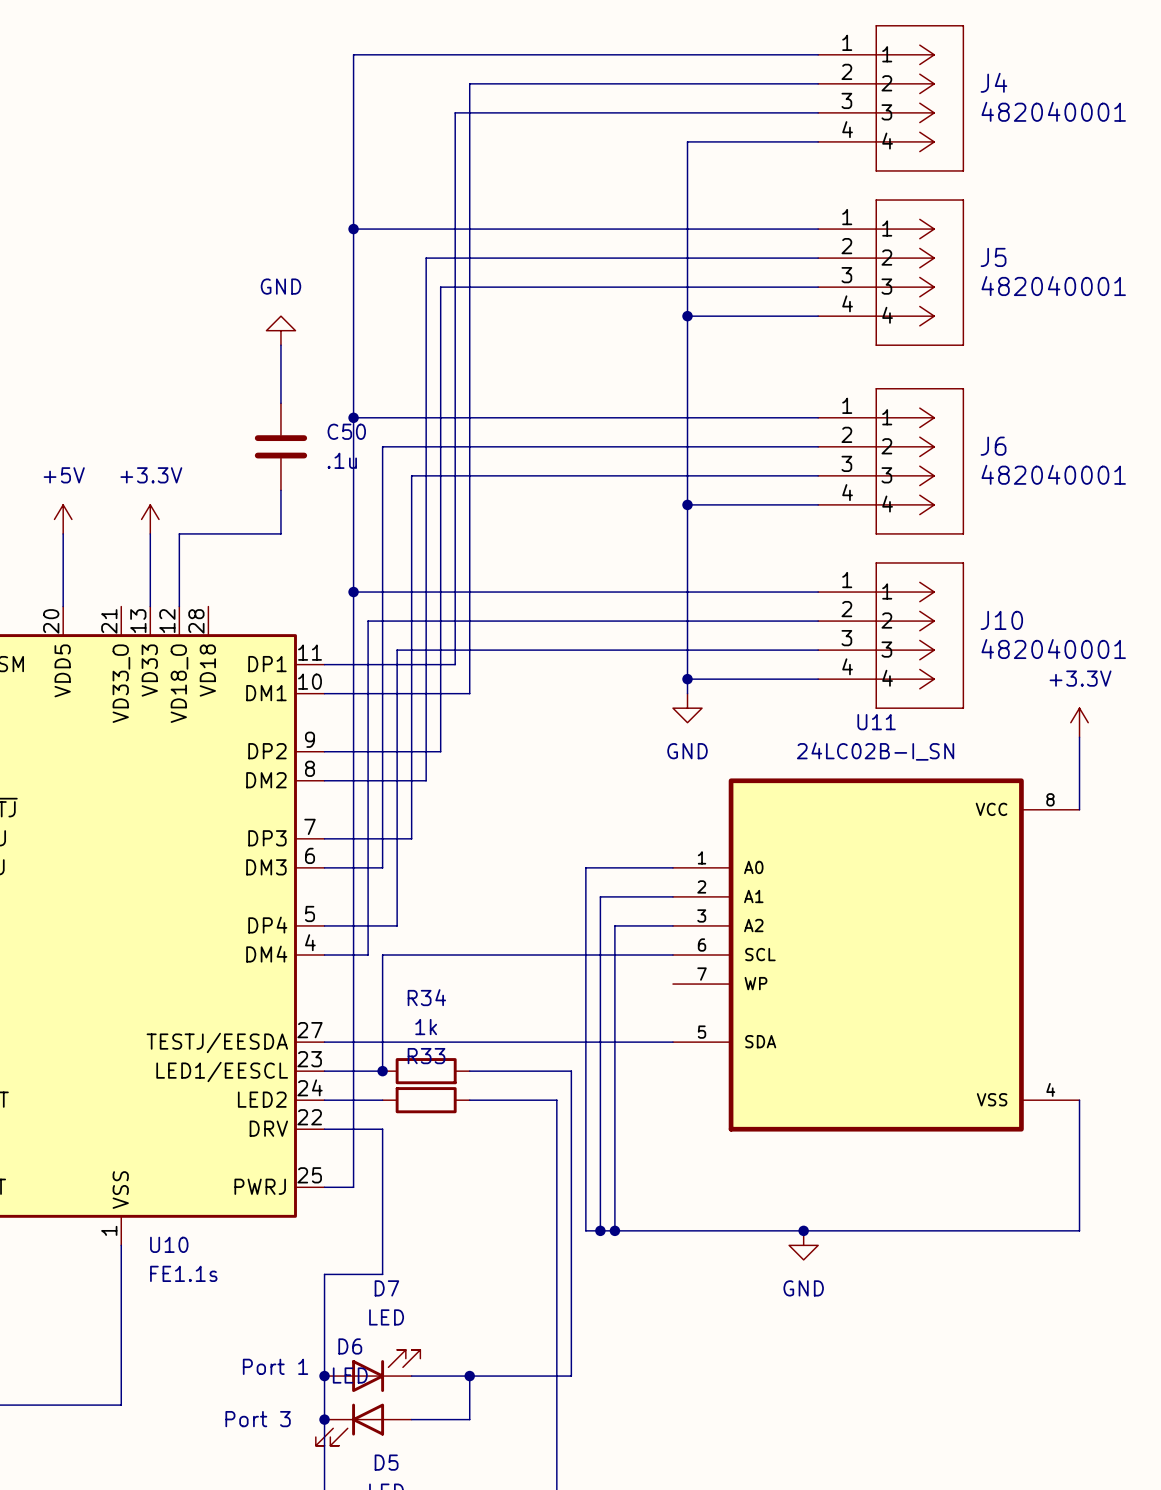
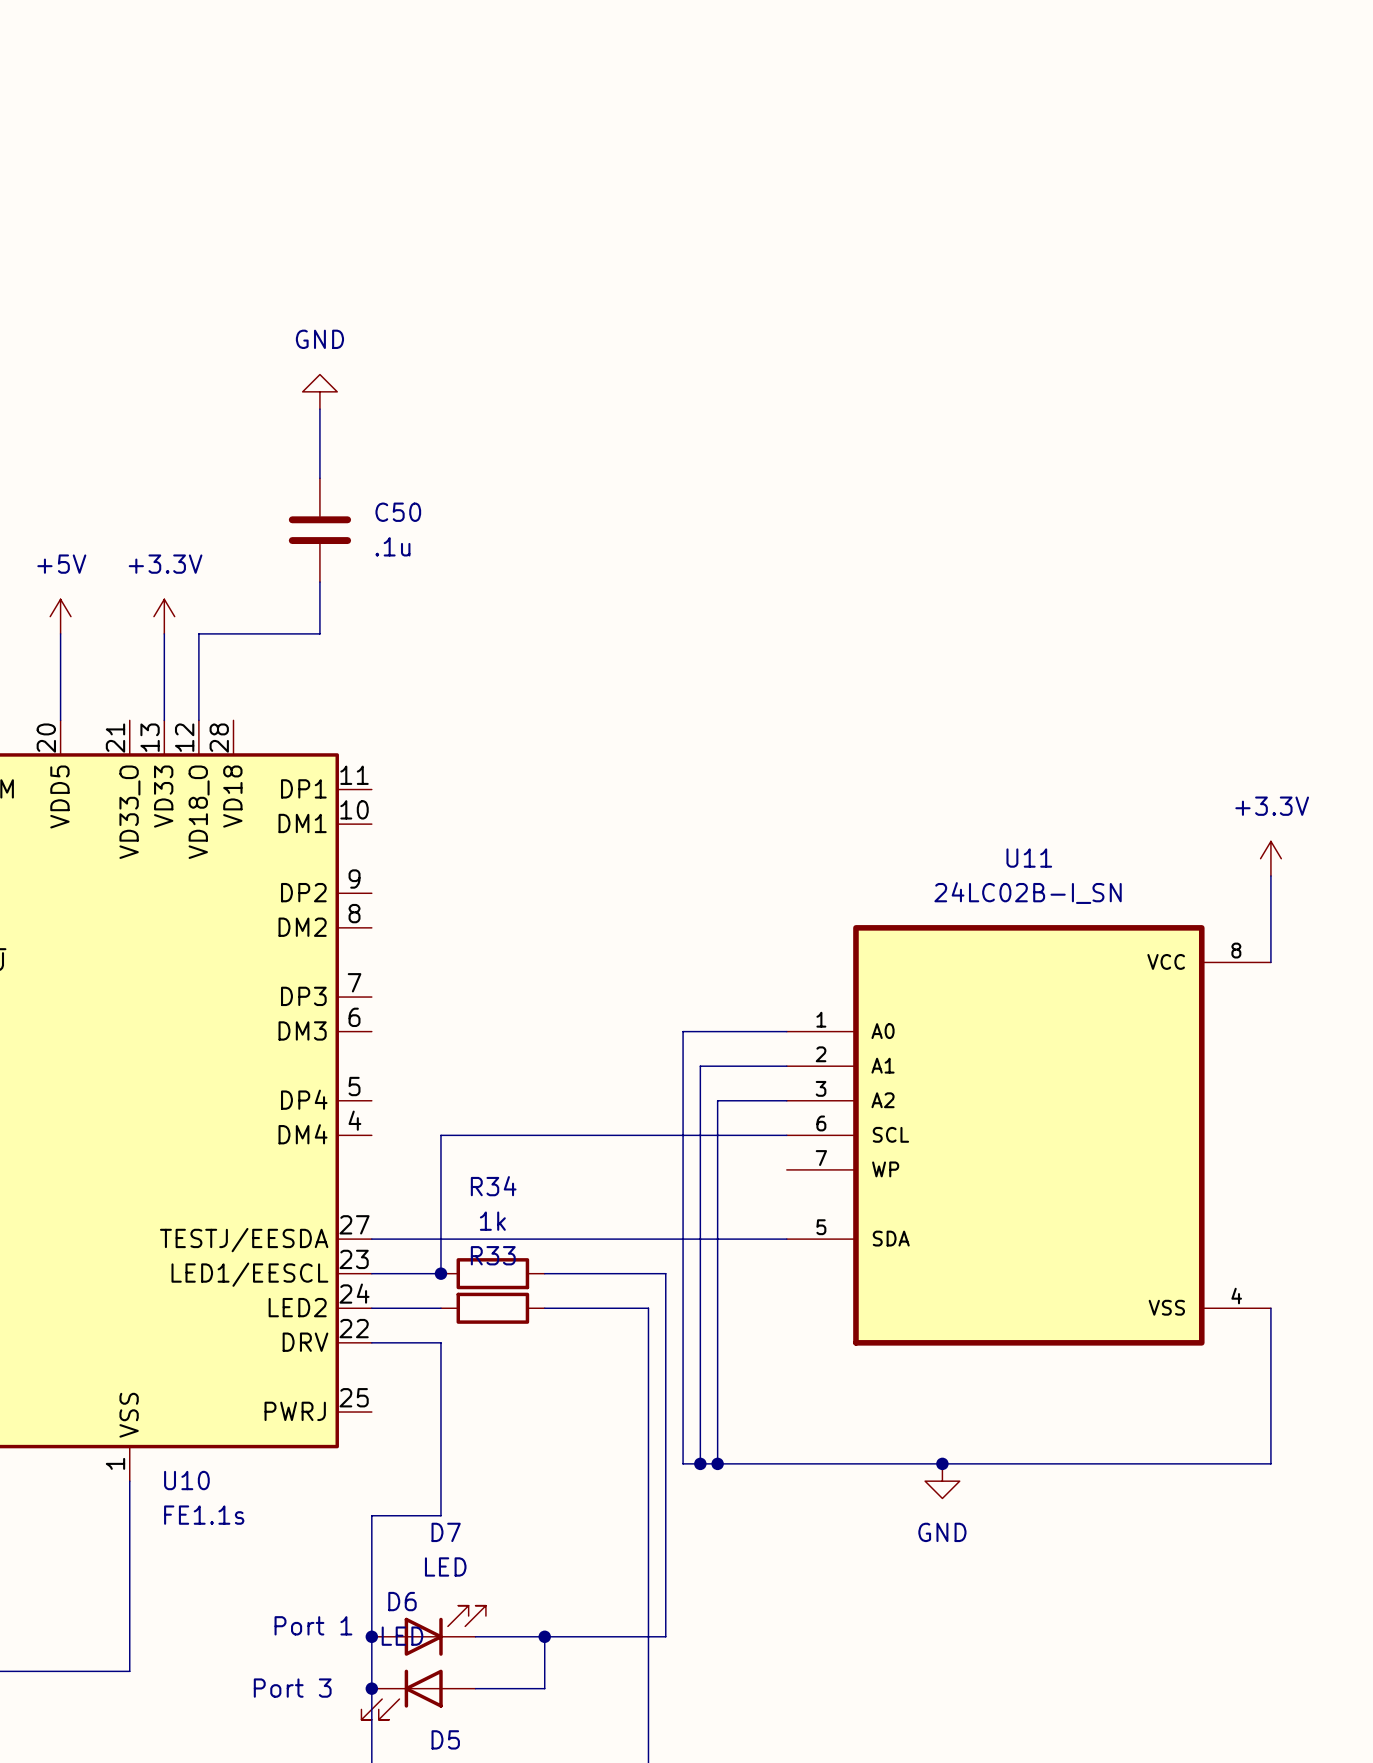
wire: (818, 54) (353, 54) (353, 1187) (324, 1187) -> none
wire: (818, 83) (469, 83) (469, 693) (324, 693) -> none
J4: 482040001 (891, 98) -> none
wire: (818, 112) (455, 112) (455, 664) (324, 664) -> none
wire: (818, 141) (687, 141) (687, 693) -> none
wire: (353, 229) (818, 229) -> none
junction: (353, 229) -> none
wire: (818, 258) (426, 258) (426, 780) (324, 780) -> none
J5: 482040001 (891, 272) -> none
wire: (818, 287) (440, 287) (440, 751) (324, 751) -> none
wire: (687, 316) (818, 316) -> none
junction: (687, 316) -> none
wire: (353, 417) (818, 417) -> none
junction: (353, 417) -> none
wire: (818, 446) (382, 446) (382, 867) (324, 867) -> none
J6: 482040001 (891, 461) -> none
wire: (818, 475) (411, 475) (411, 838) (324, 838) -> none
wire: (687, 504) (818, 504) -> none
junction: (687, 504) -> none
wire: (353, 592) (818, 592) -> none
junction: (353, 592) -> none
wire: (818, 621) (368, 621) (368, 955) (324, 955) -> none
J10: 482040001 (891, 635) -> none
wire: (818, 650) (397, 650) (397, 925) (324, 925) -> none
wire: (687, 679) (818, 679) -> none
junction: (687, 679) -> none
power symbol: GND (687, 708) -> none

